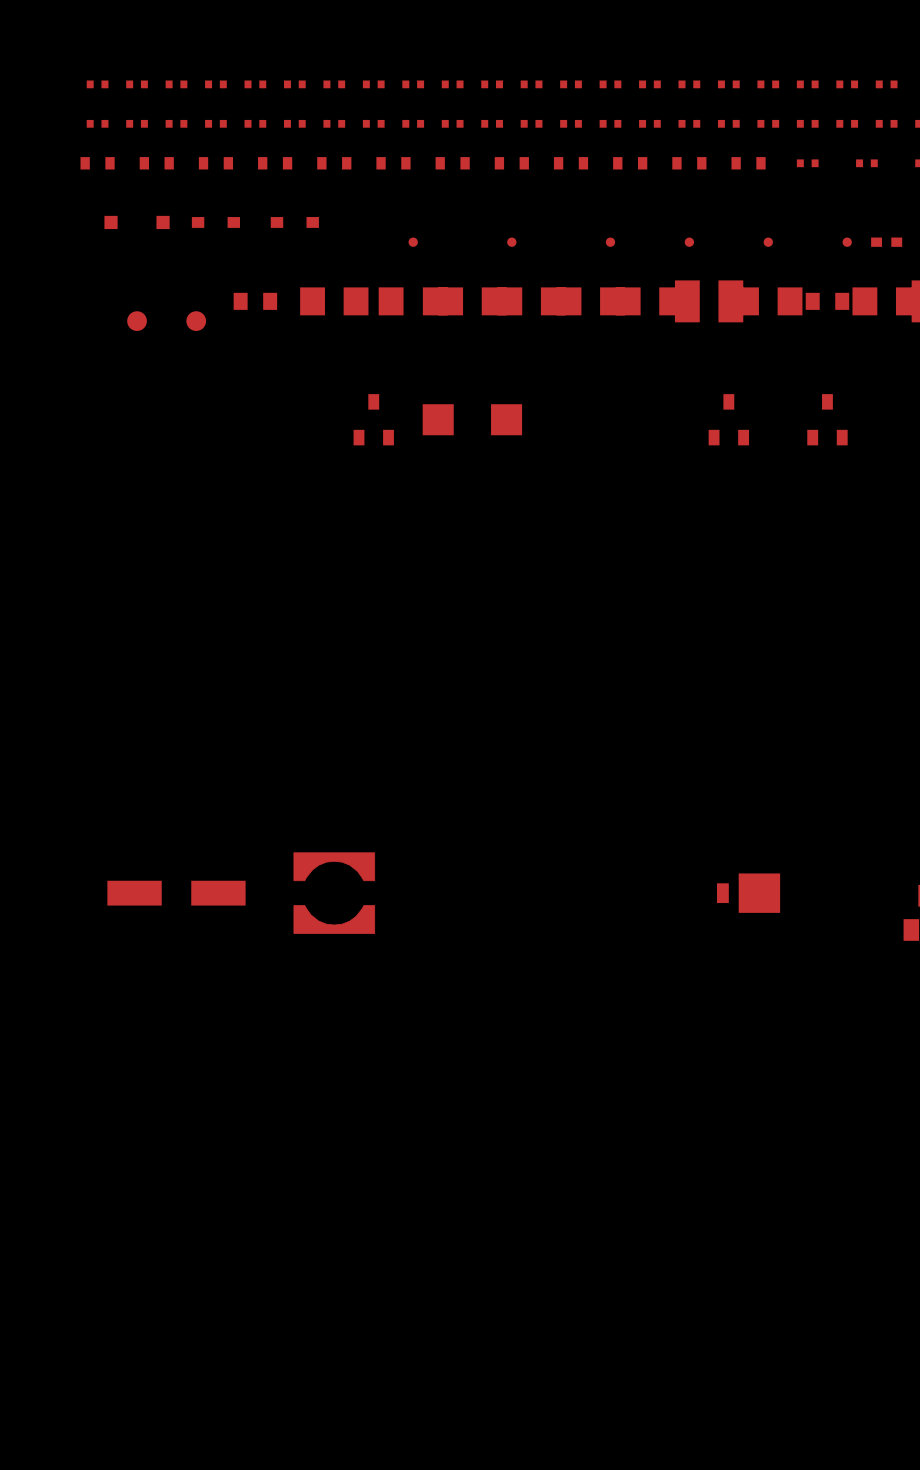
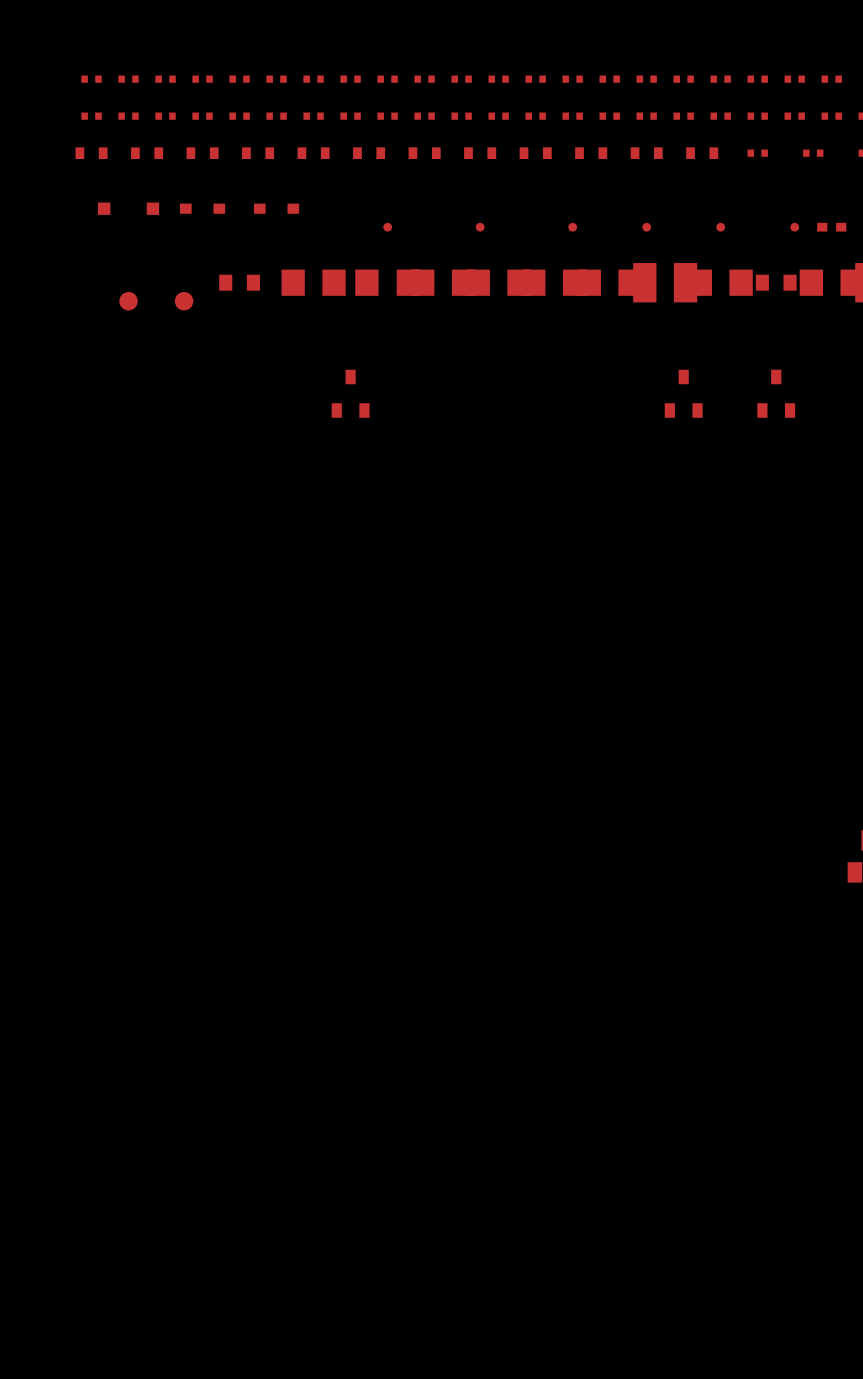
part: (472, 419) -> none
part: (176, 893) -> none
part: (334, 893) -> none
part: (748, 893) -> none

